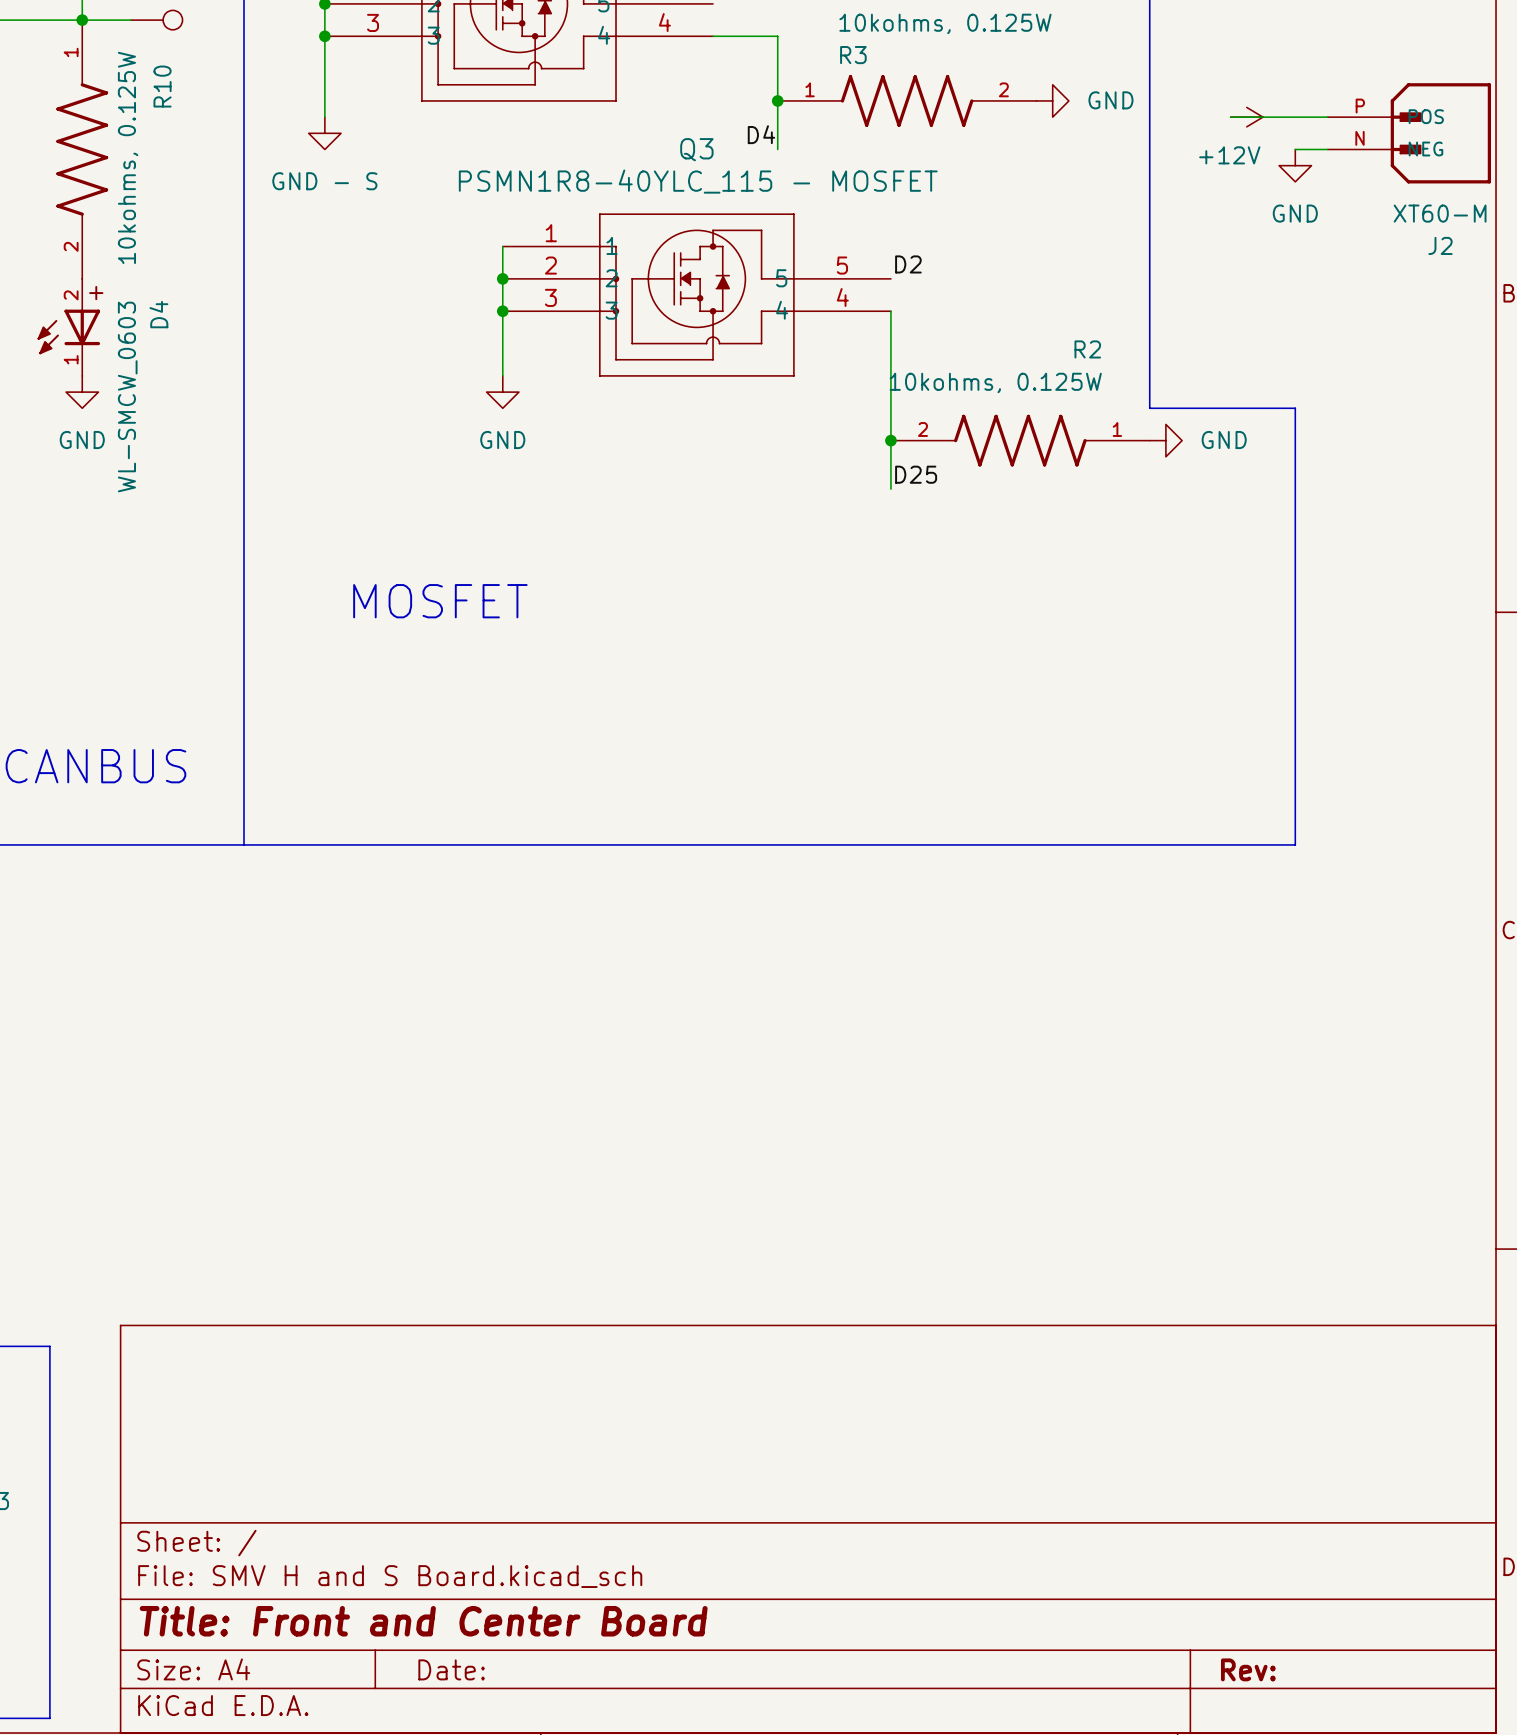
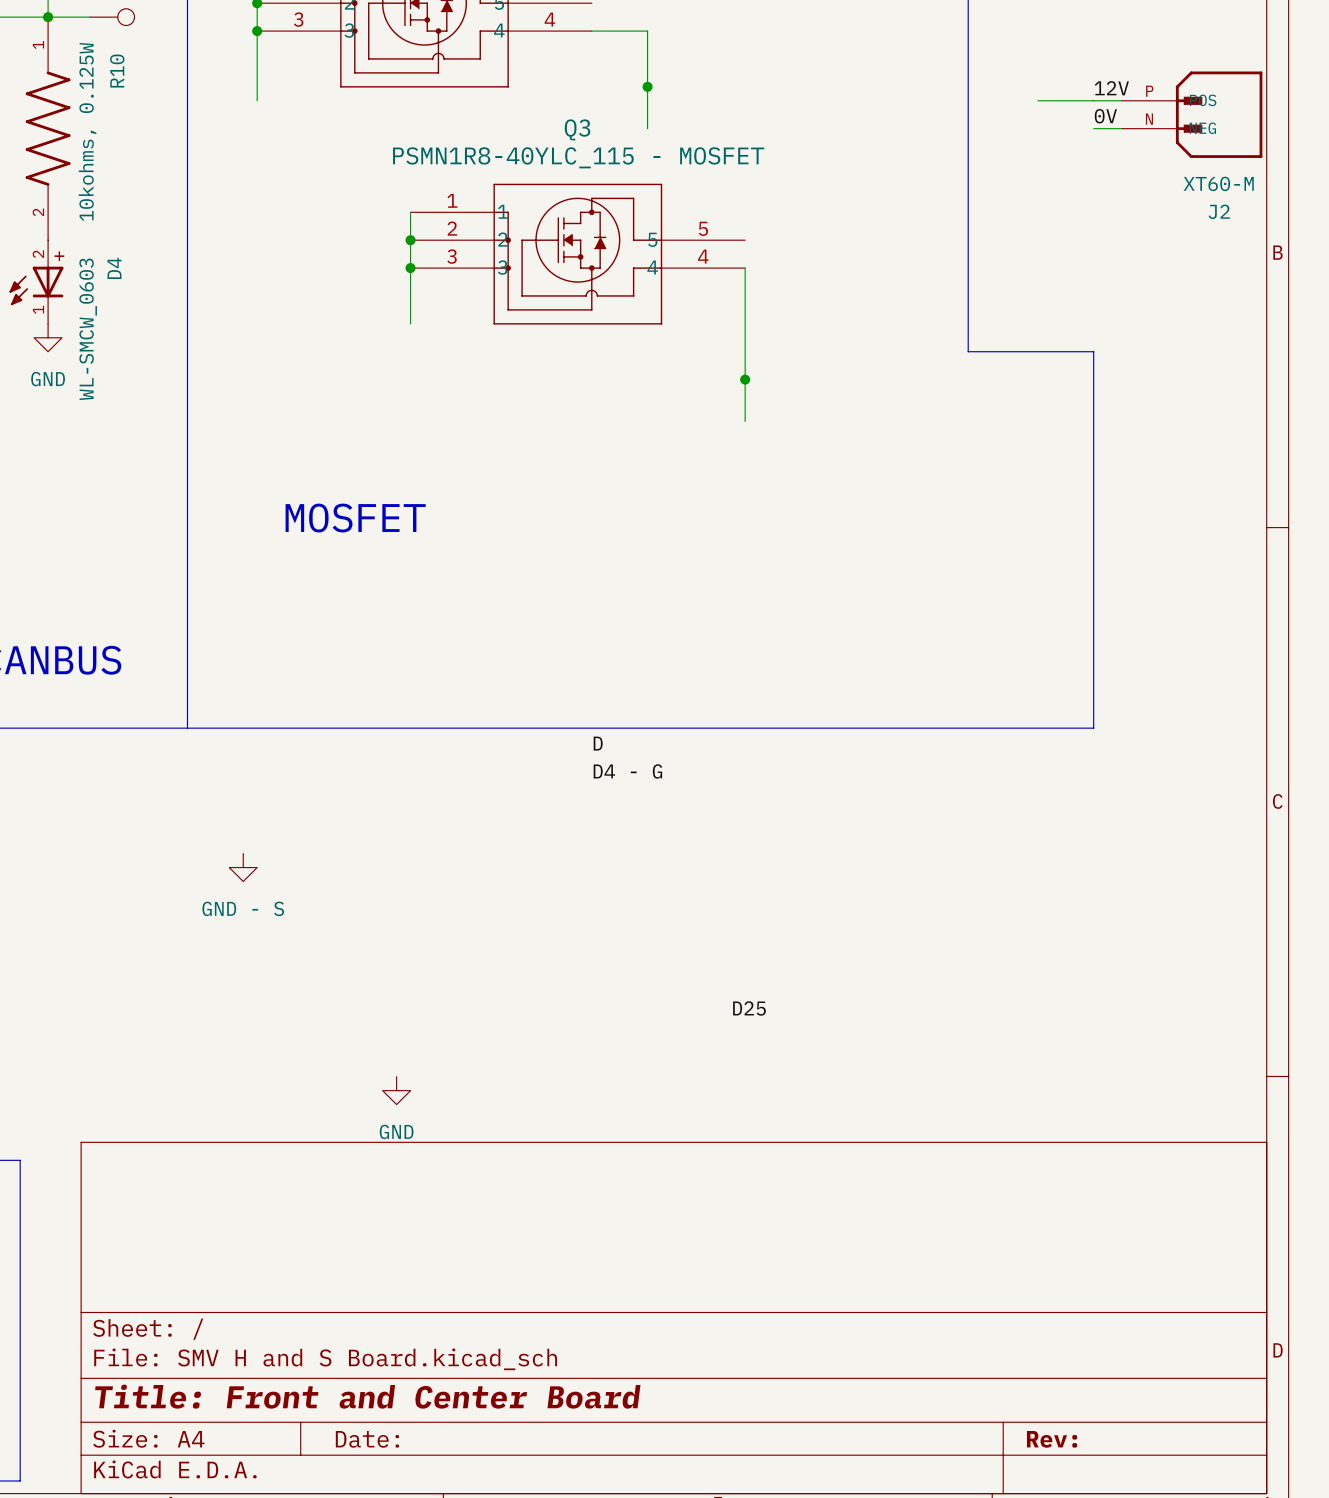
R3: 10kohms, 0.125W (907, 100) -> none
power symbol: GND (1052, 100) -> none
label: none -> 12V (1111, 88)
power symbol: +12V (1246, 117) -> none
power symbol: GND - S (324, 133) -> none
label: D4 (761, 134) -> none
label: none -> 0V (1105, 116)
power symbol: GND (1295, 165) -> none
label: D2 (908, 264) -> none
power symbol: GND (502, 392) -> none
R2: 10kohms, 0.125W (1020, 440) -> none
power symbol: GND (1165, 440) -> none
label: D25 (916, 474) -> none
label: none -> D (598, 743)
label: none -> D4 - G (627, 771)
power symbol: none -> GND - S (243, 867)
label: none -> D25 (749, 1008)
power symbol: none -> GND (396, 1090)

